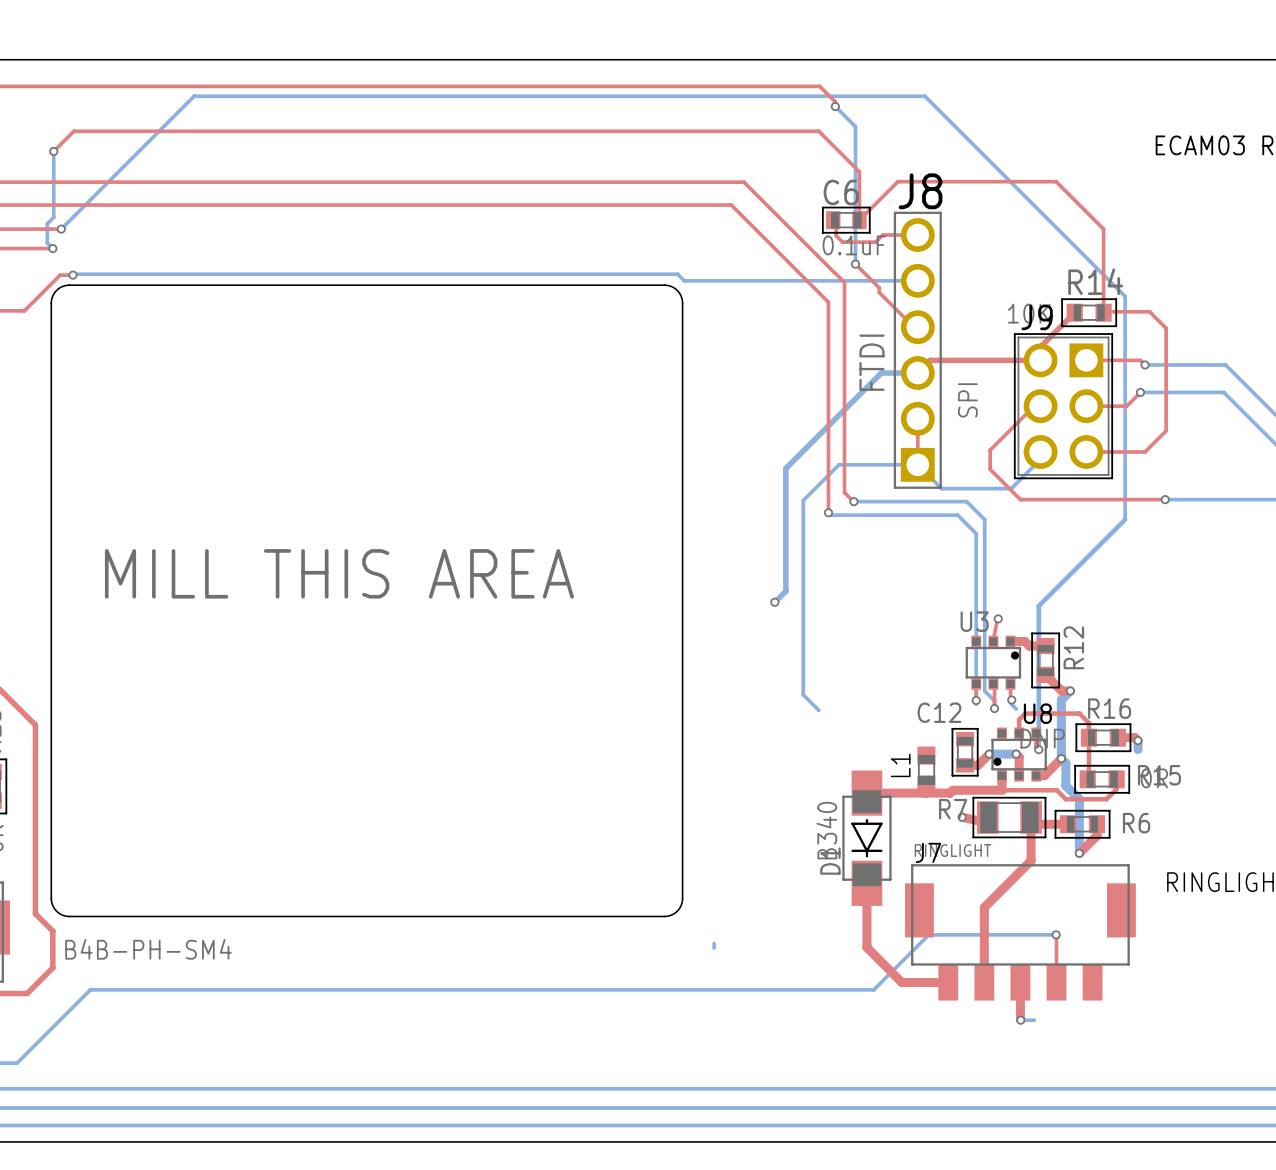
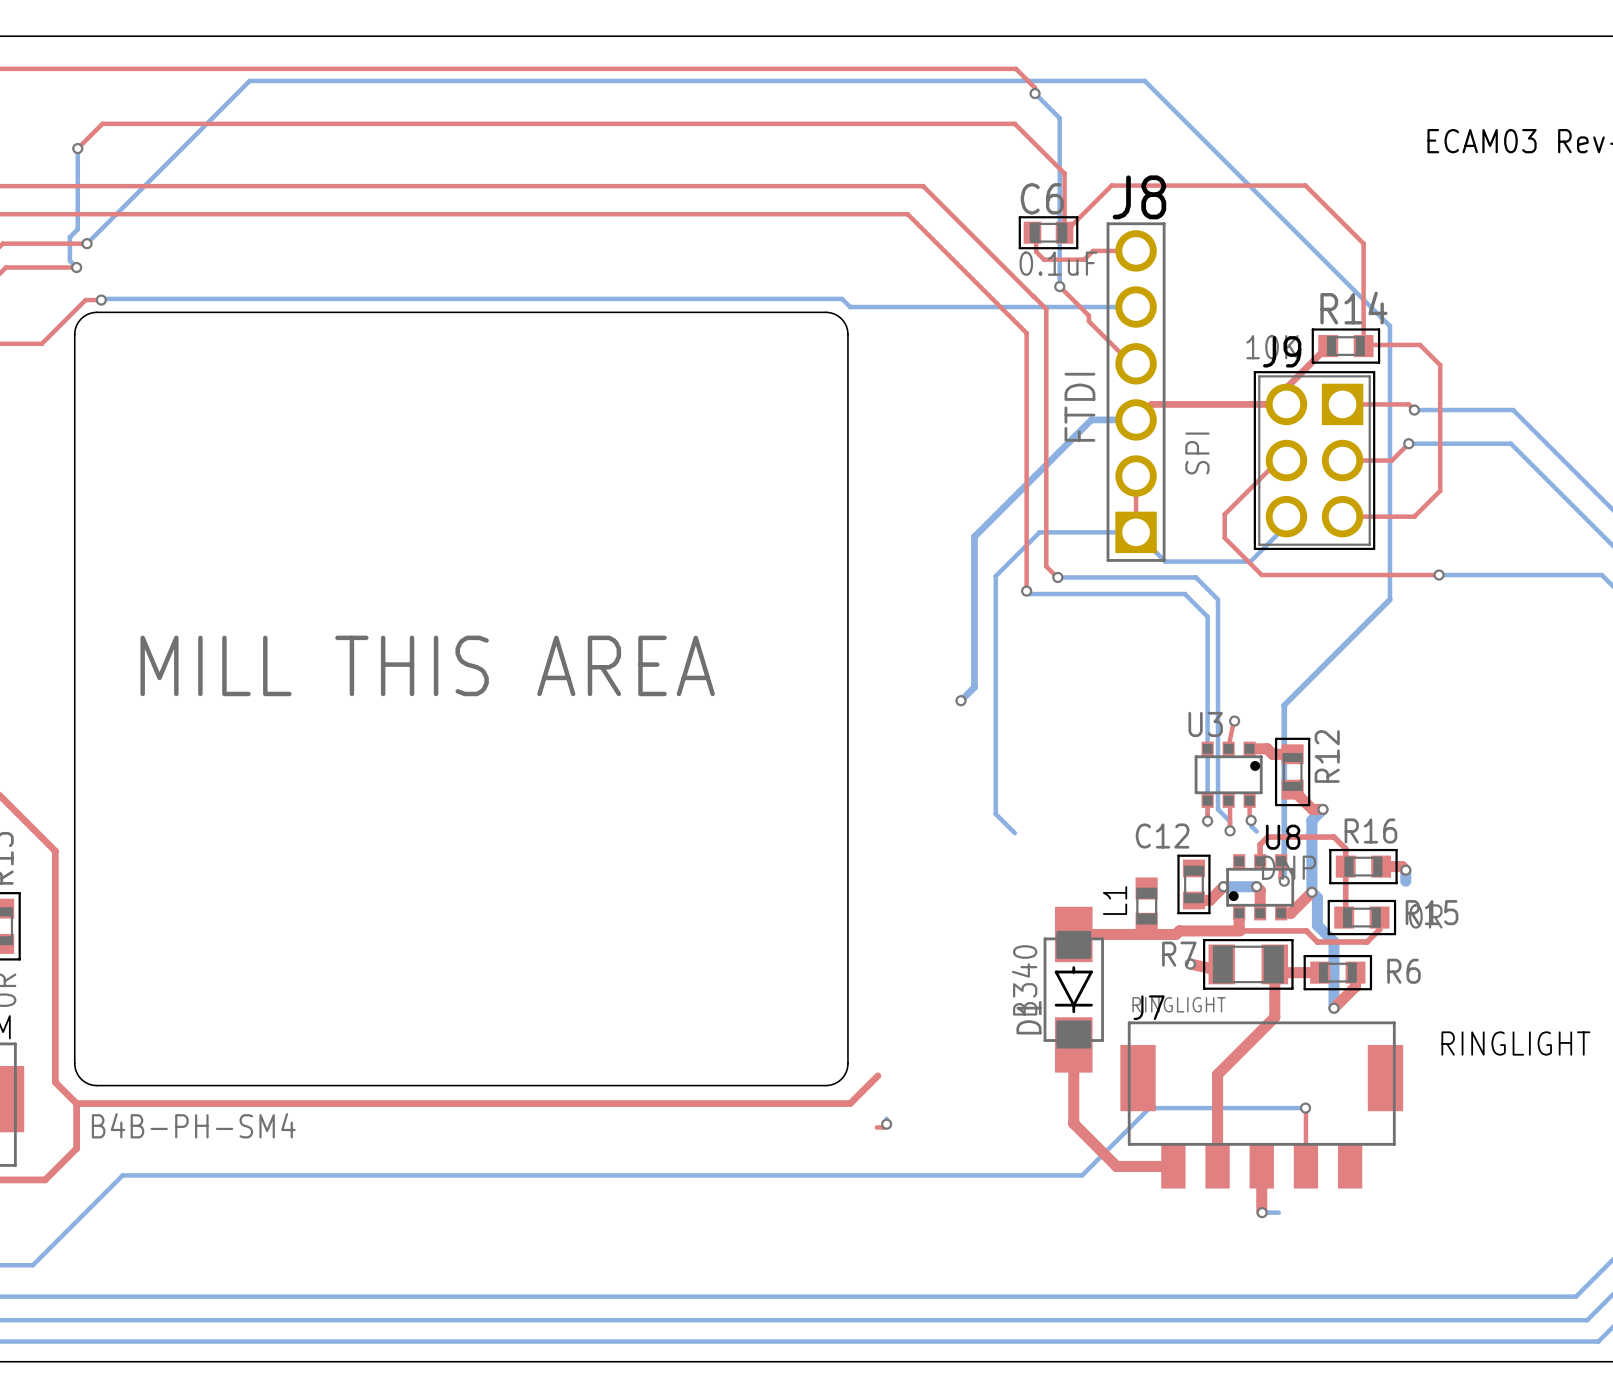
top track: none -> (877, 1075) (850, 1103) (76, 1103)
top track: none -> (886, 1124) (883, 1127) (876, 1127)
via: none -> (886, 1124)

